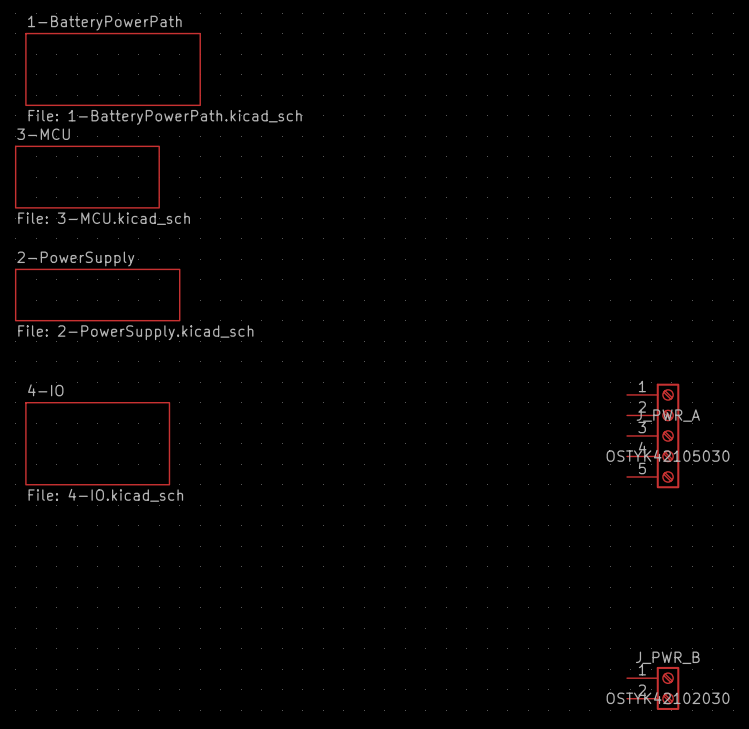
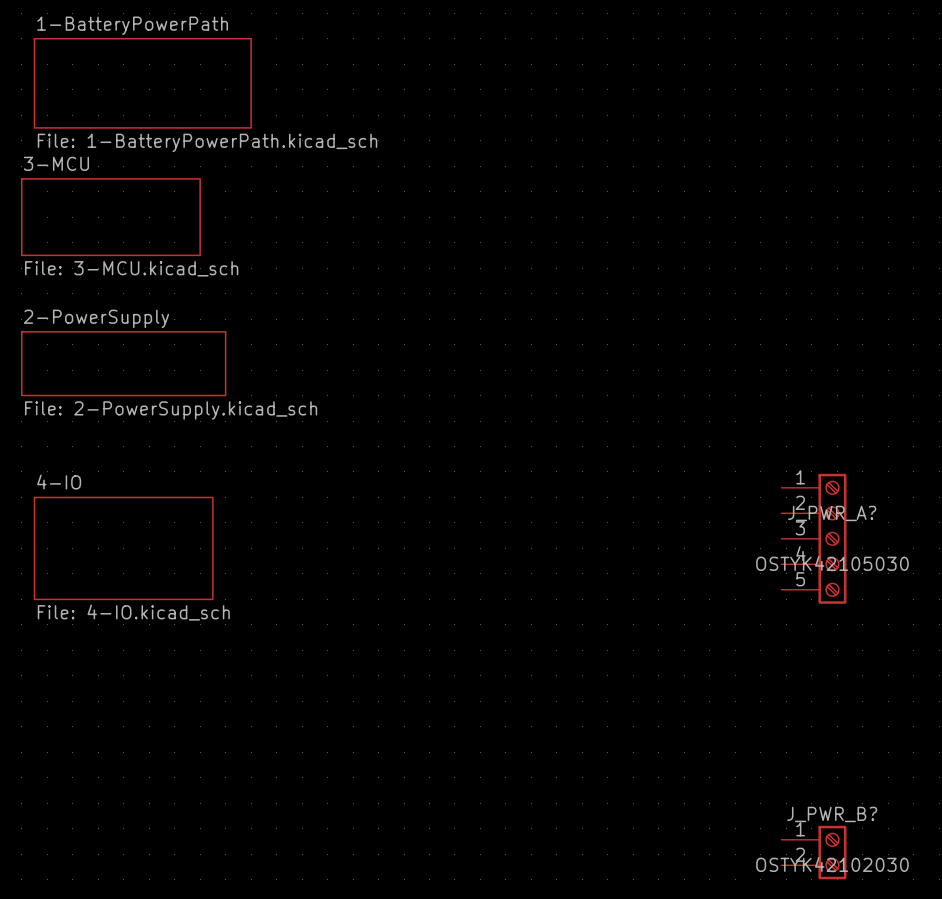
J_PWR_A name: J_PWR_A (668, 415) -> J_PWR_A? (832, 513)
J_PWR_B name: J_PWR_B (667, 657) -> J_PWR_B? (832, 814)

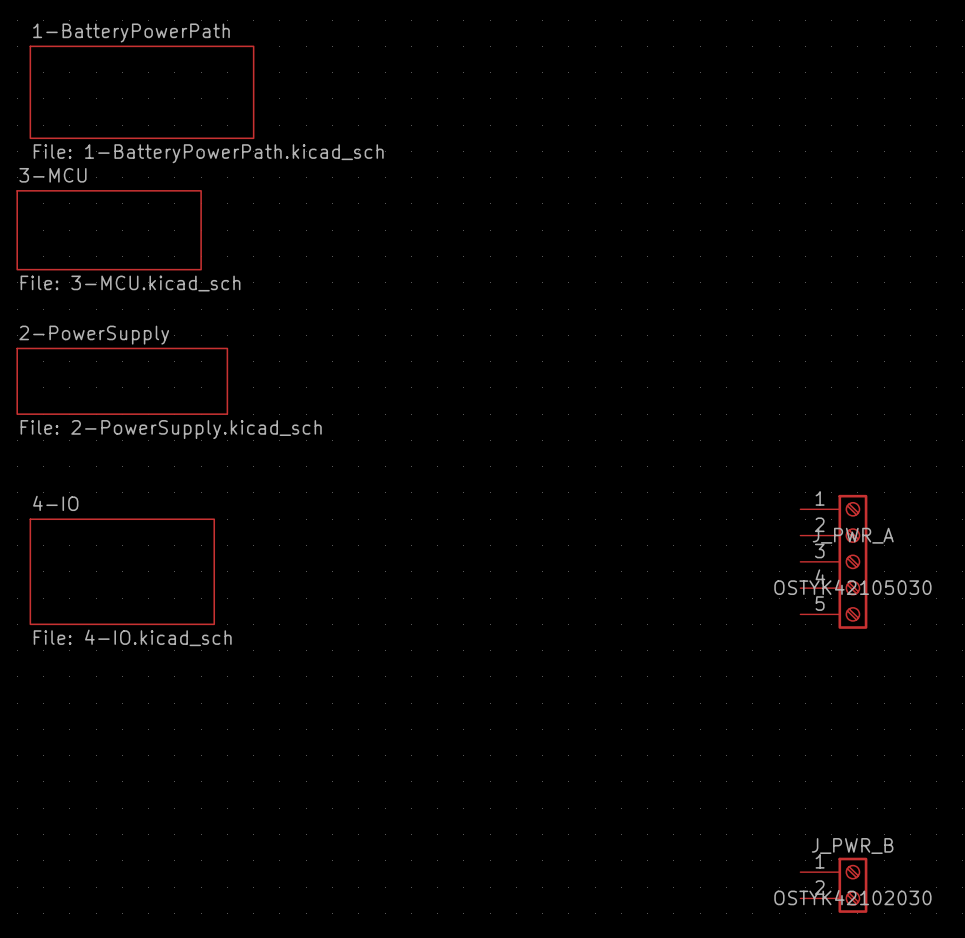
J_PWR_A? name: J_PWR_A? (832, 513) -> J_PWR_A (853, 535)
J_PWR_B? name: J_PWR_B? (832, 814) -> J_PWR_B (852, 846)

